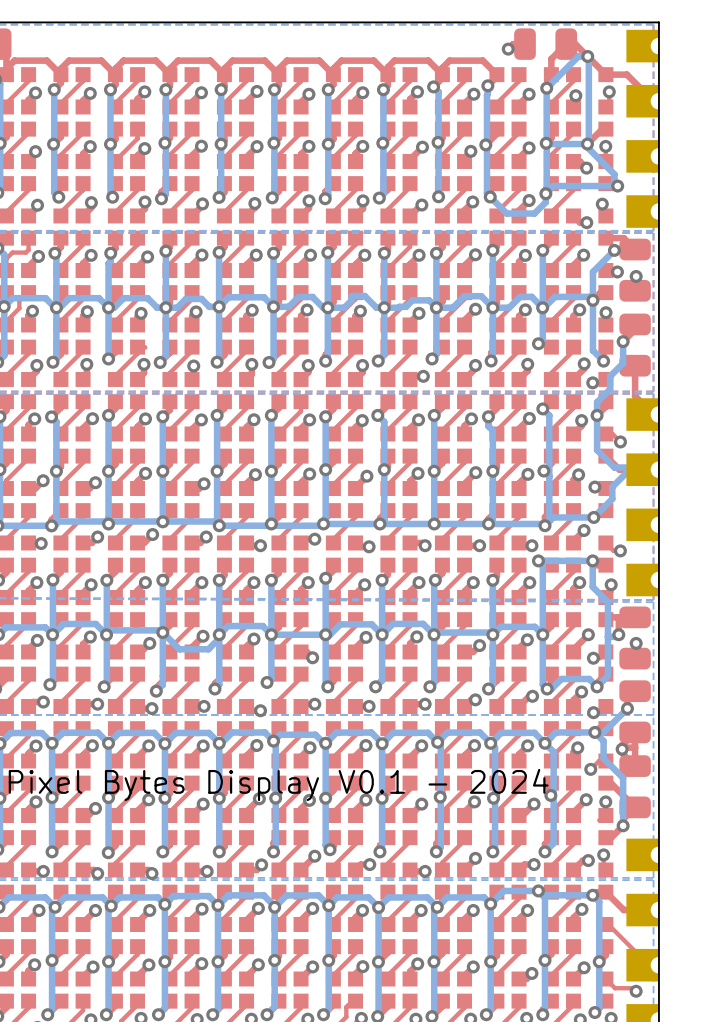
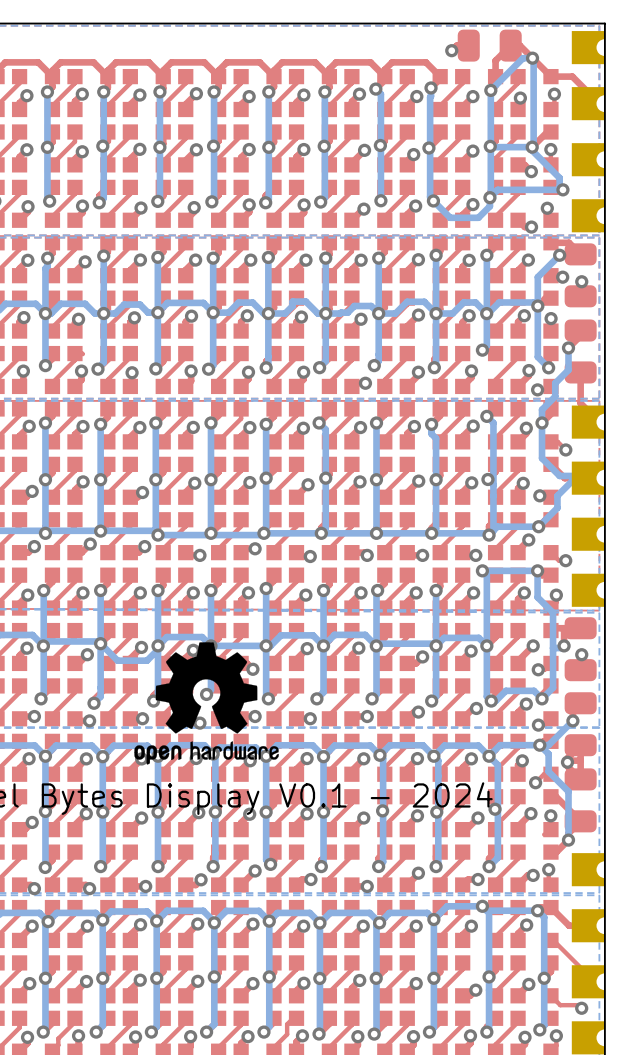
drawing: none -> [134, 642, 279, 765]

